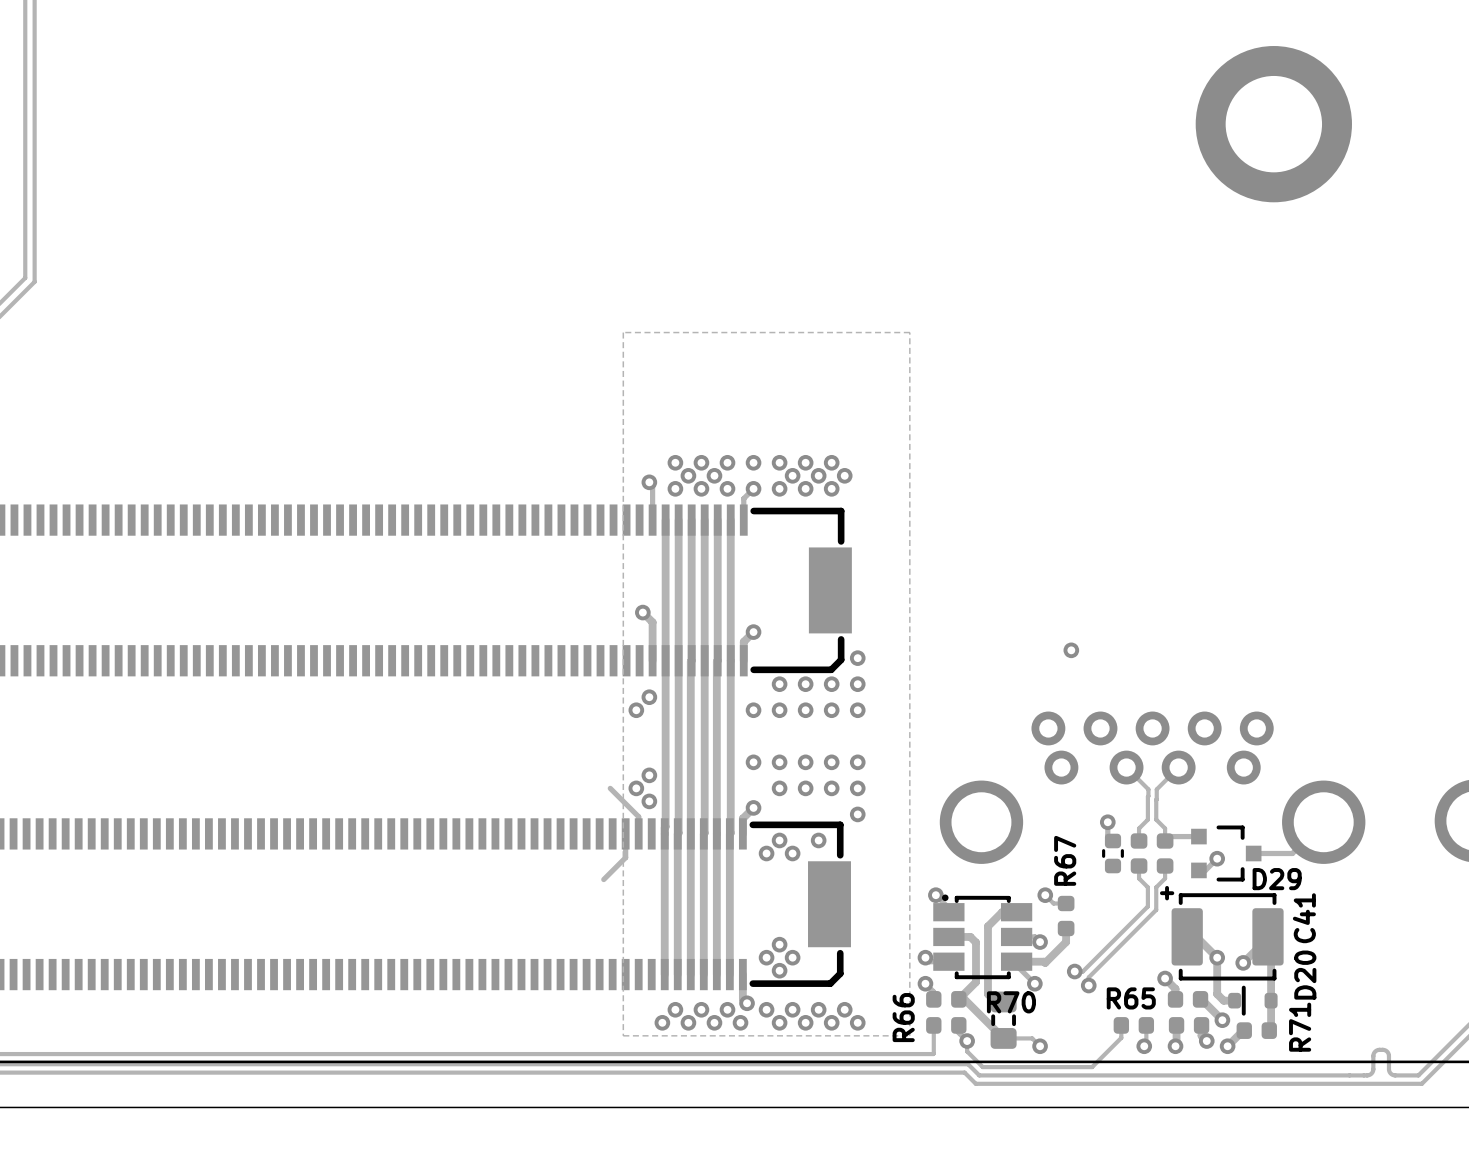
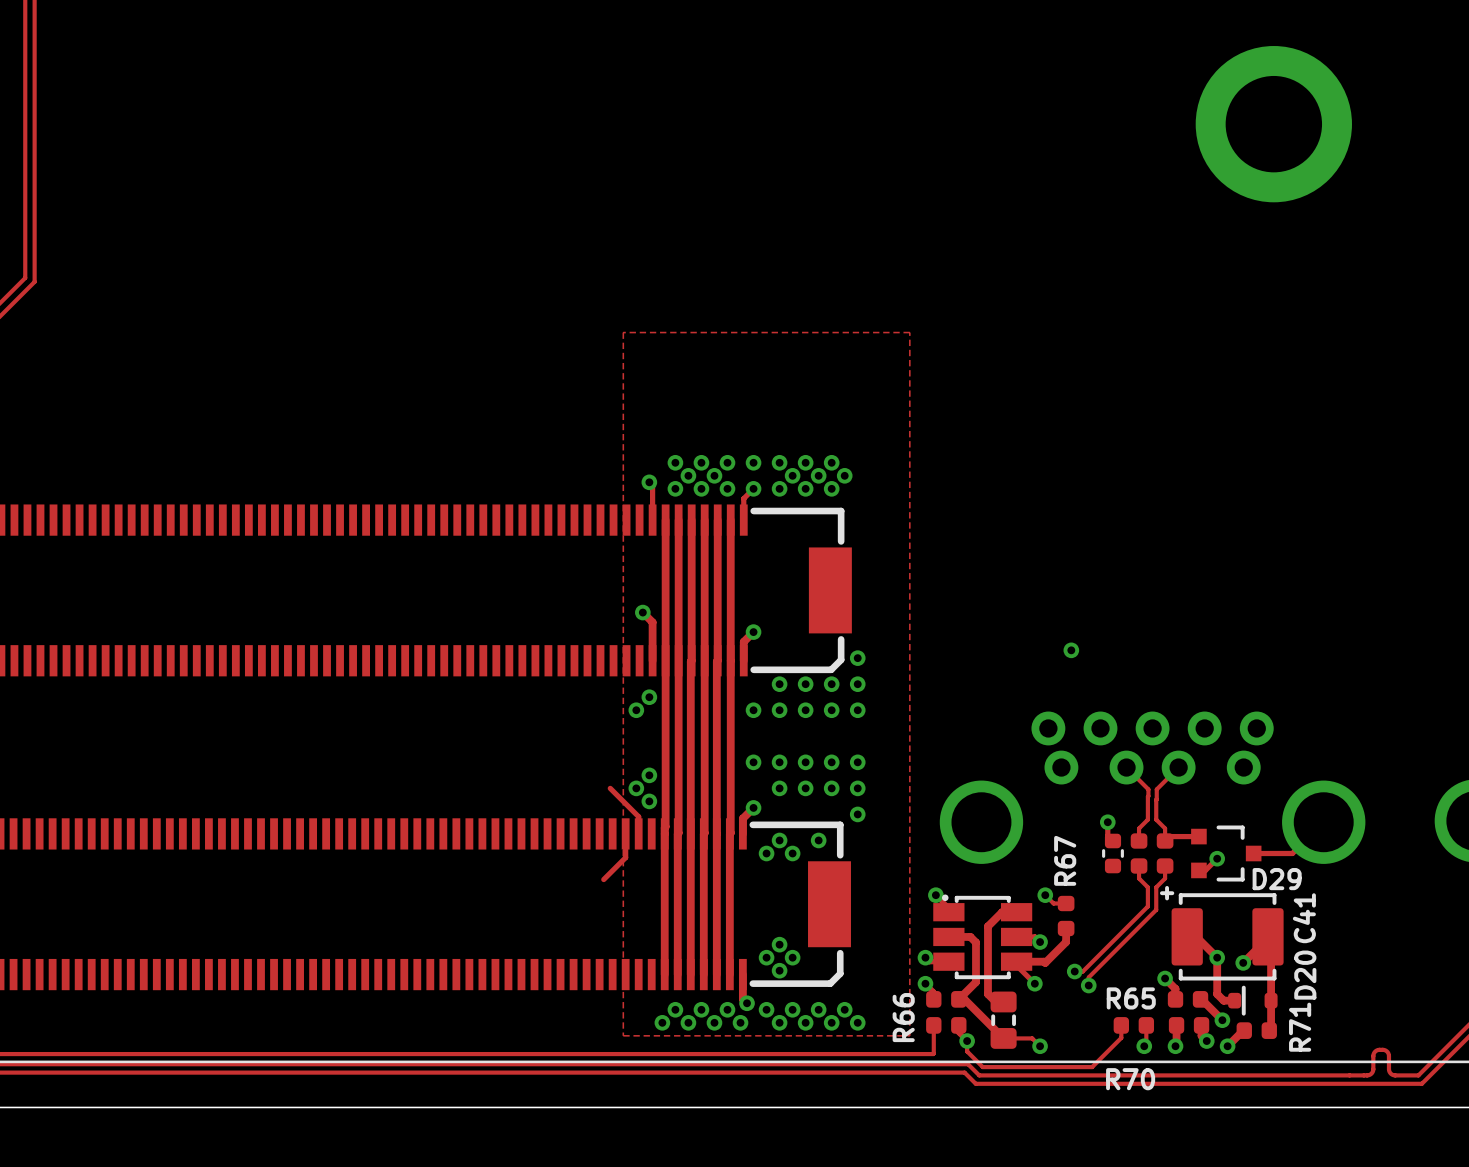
R70 name position: R70 (1011, 1002) -> R70 (1130, 1079)

